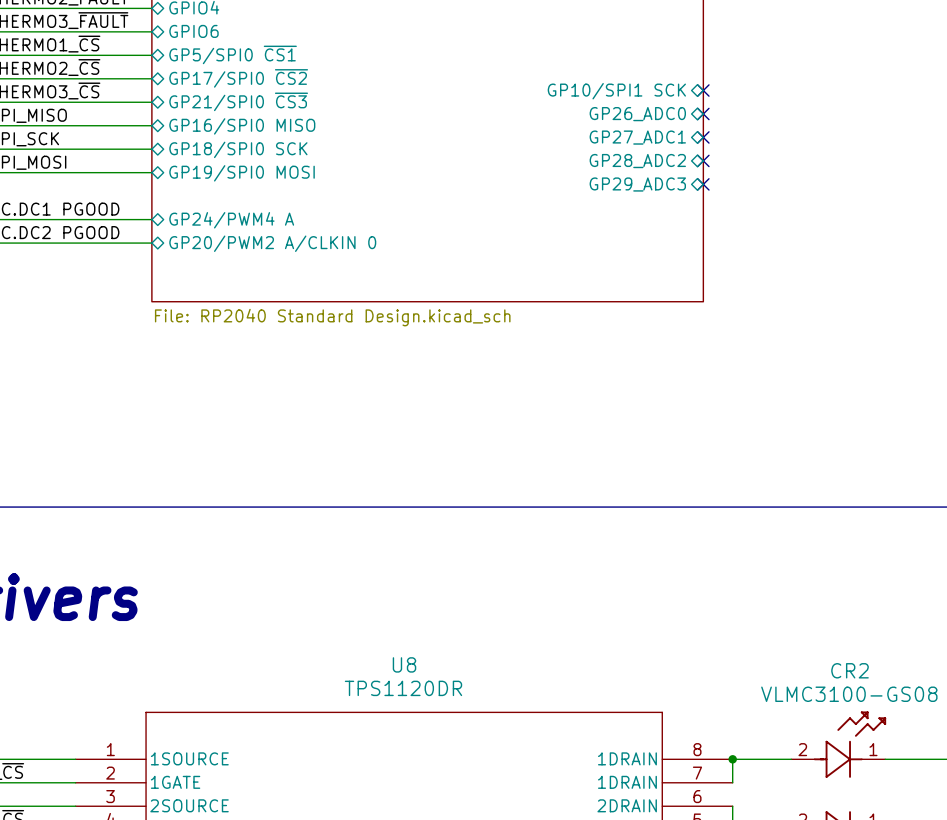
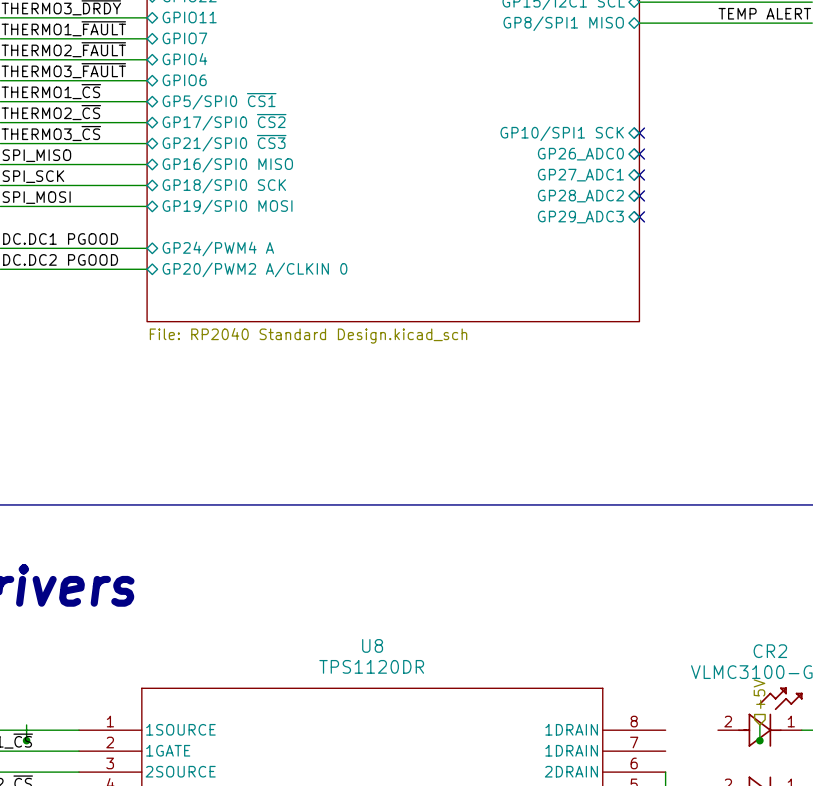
hierarchical label: none -> +5V (759, 694)
wire: none -> (26, 724) (26, 740)
wire: none -> (759, 724) (759, 740)
junction: (732, 759) -> none
wire: (791, 759) (732, 759) (732, 782) -> none
junction: none -> (26, 740)
junction: none -> (759, 740)

